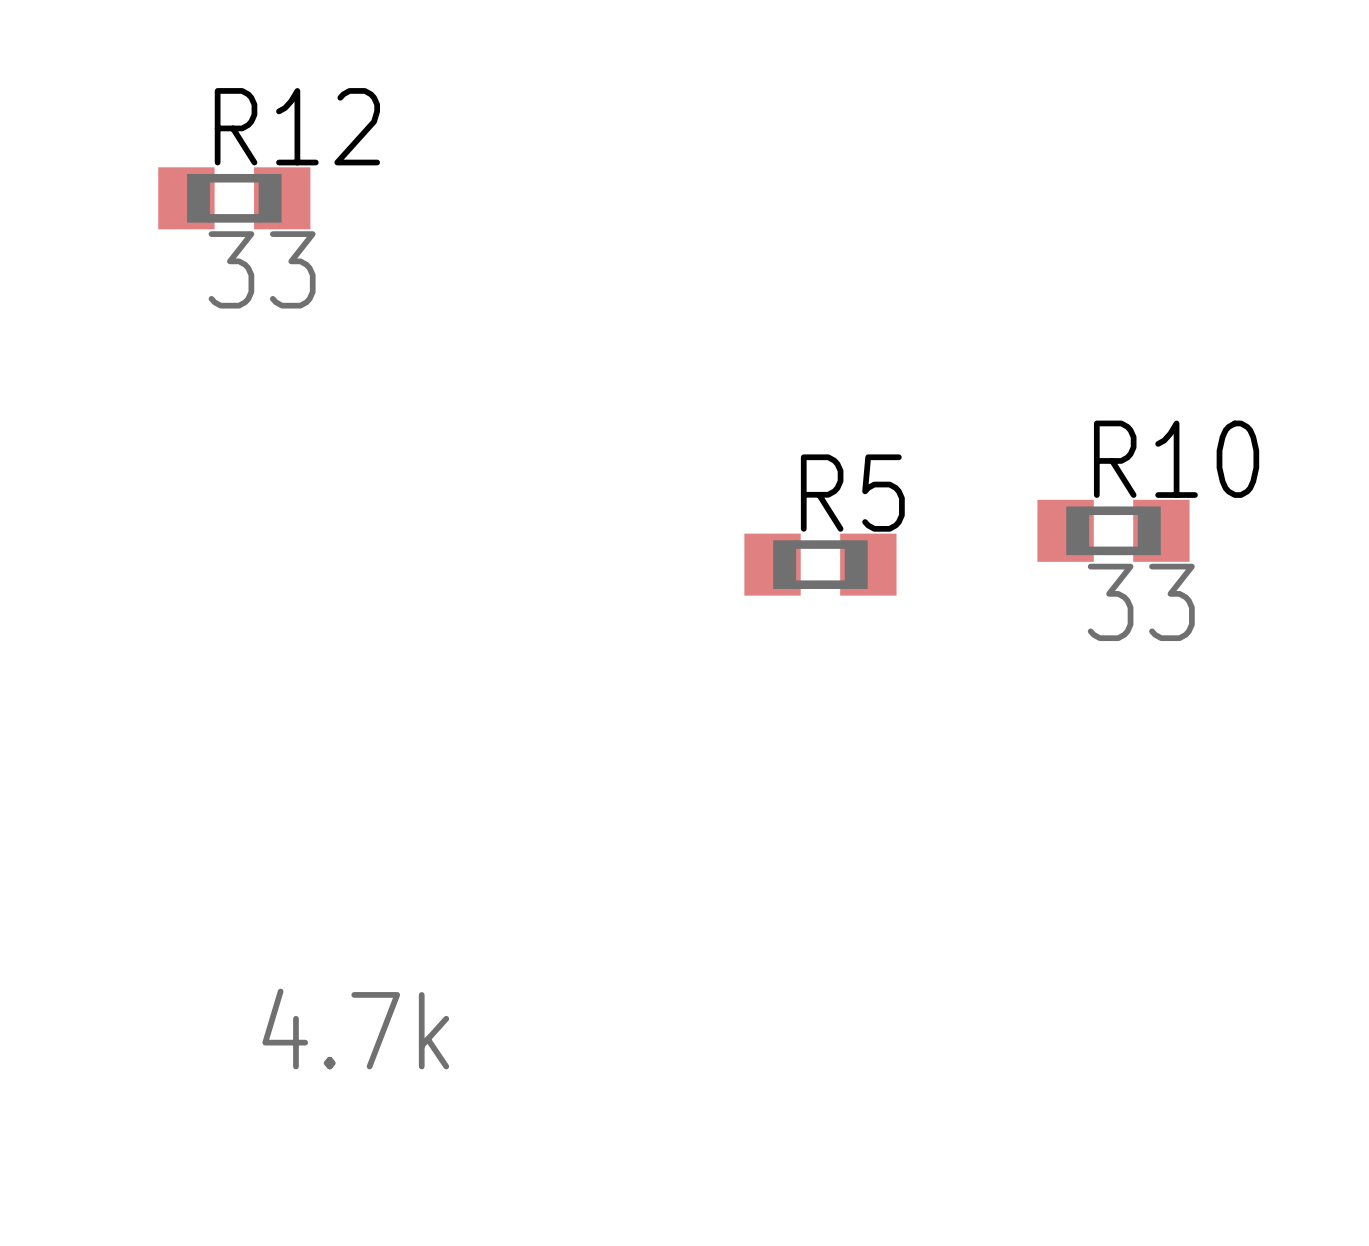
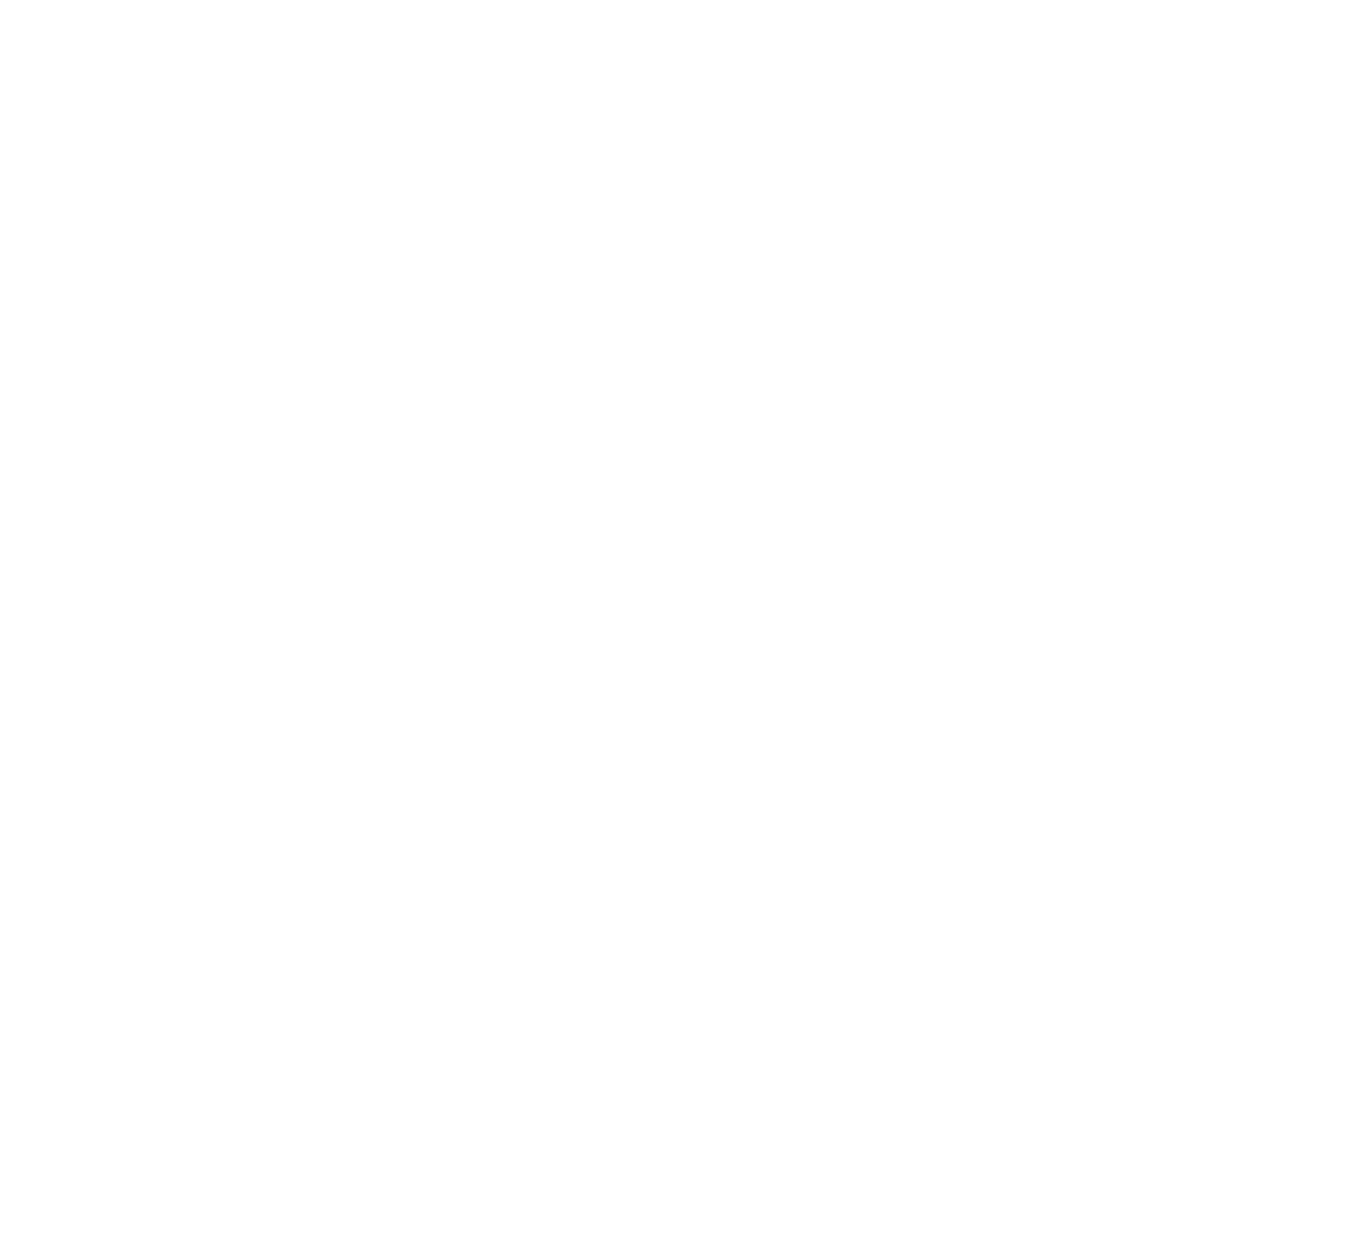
R12: 33 (234, 198) -> none
R10: 33 (1113, 530) -> none
R5: 4.7k (820, 564) -> none

